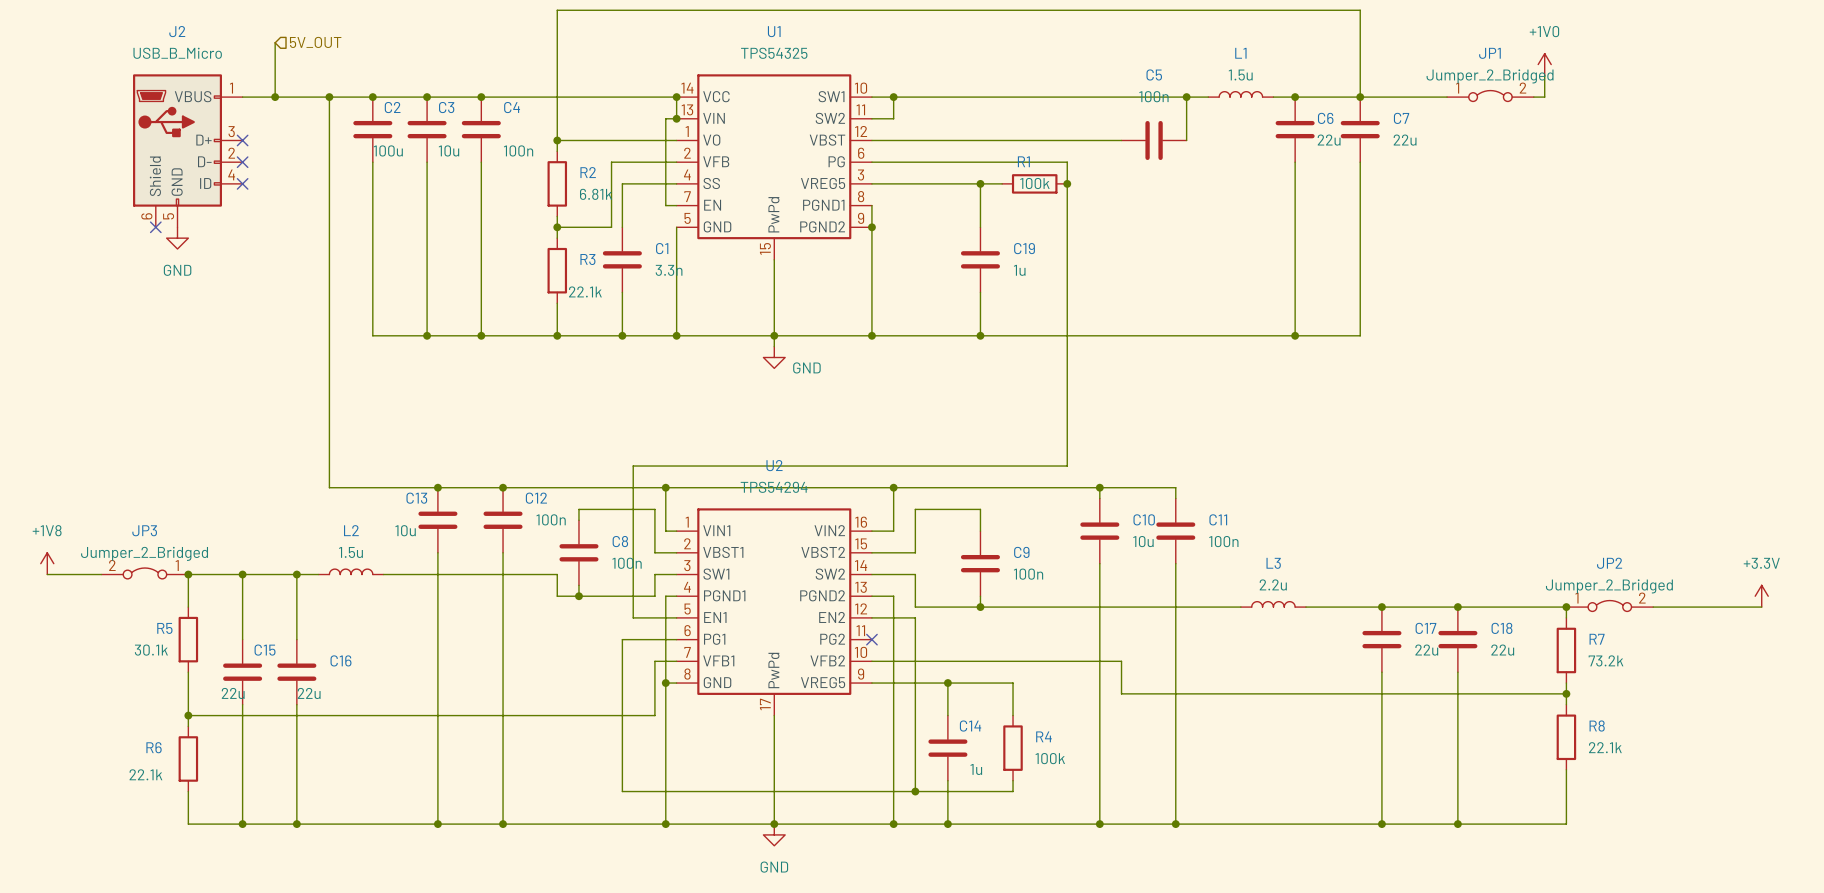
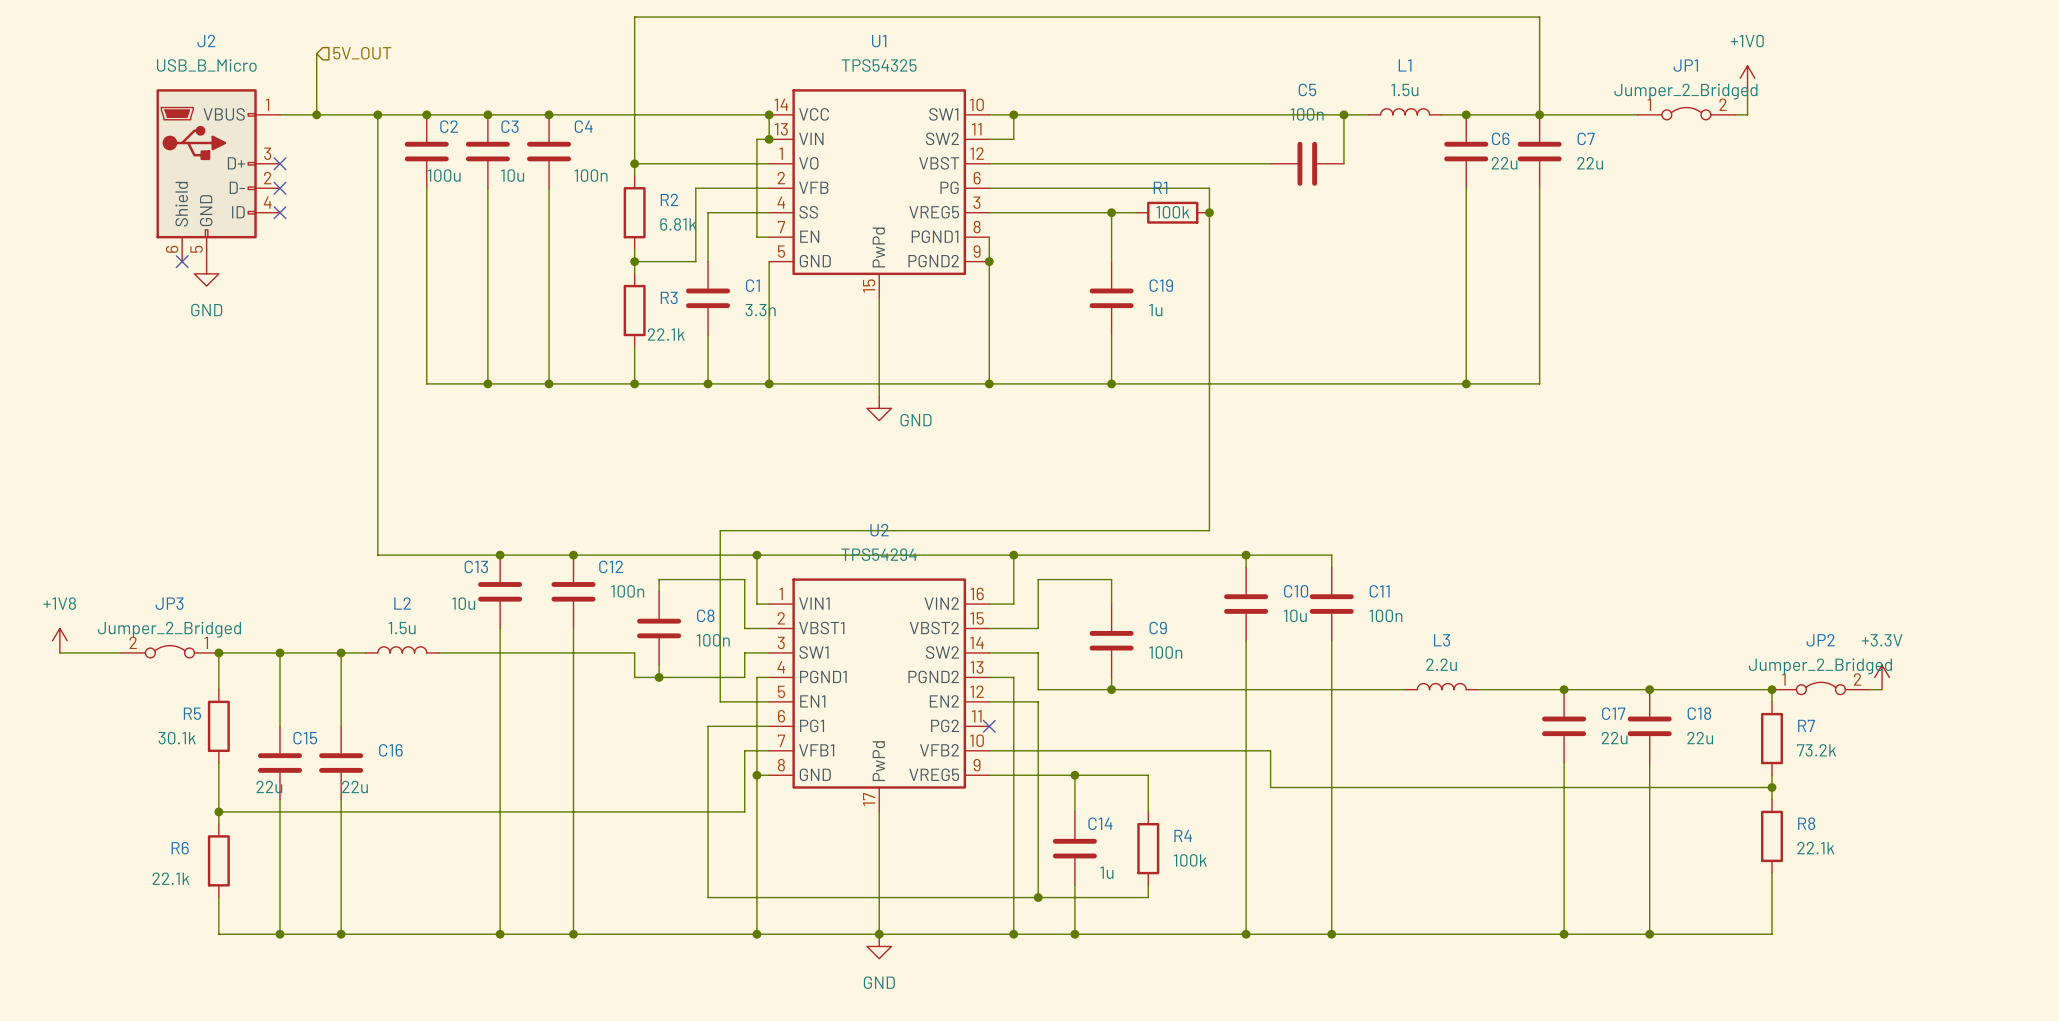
junction: (774, 335) -> none
power symbol position: +3.3V (1761, 596) -> +3.3V (1882, 677)
wire: (1664, 607) (1761, 607) -> none

